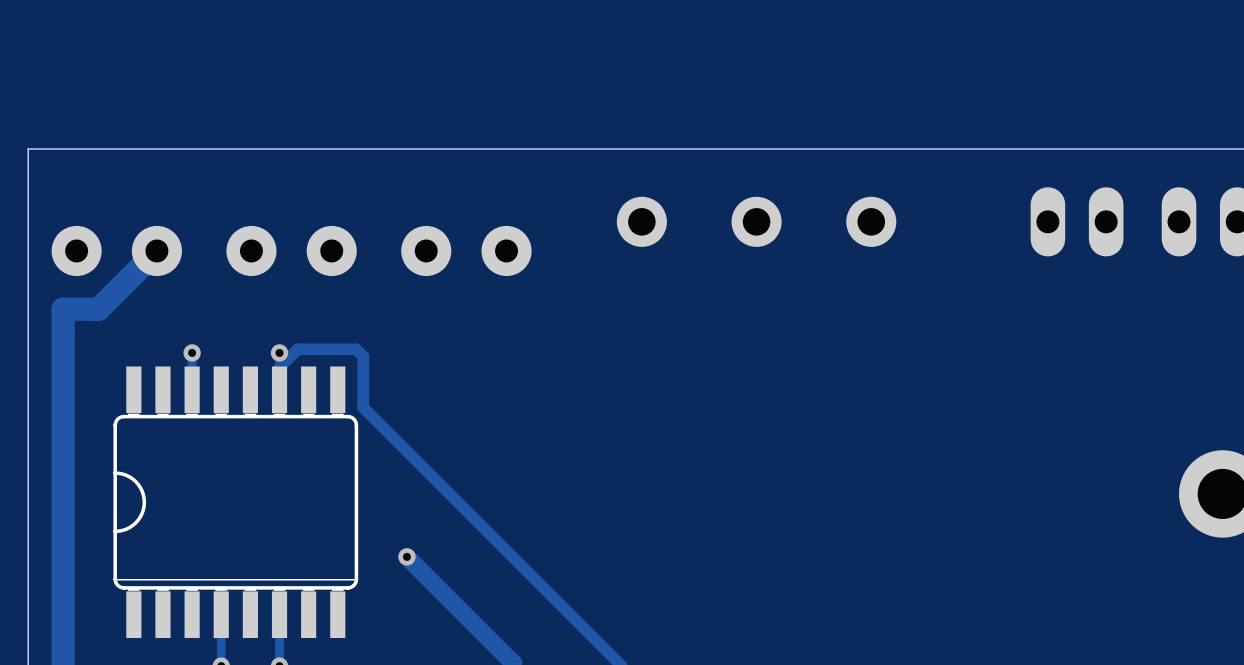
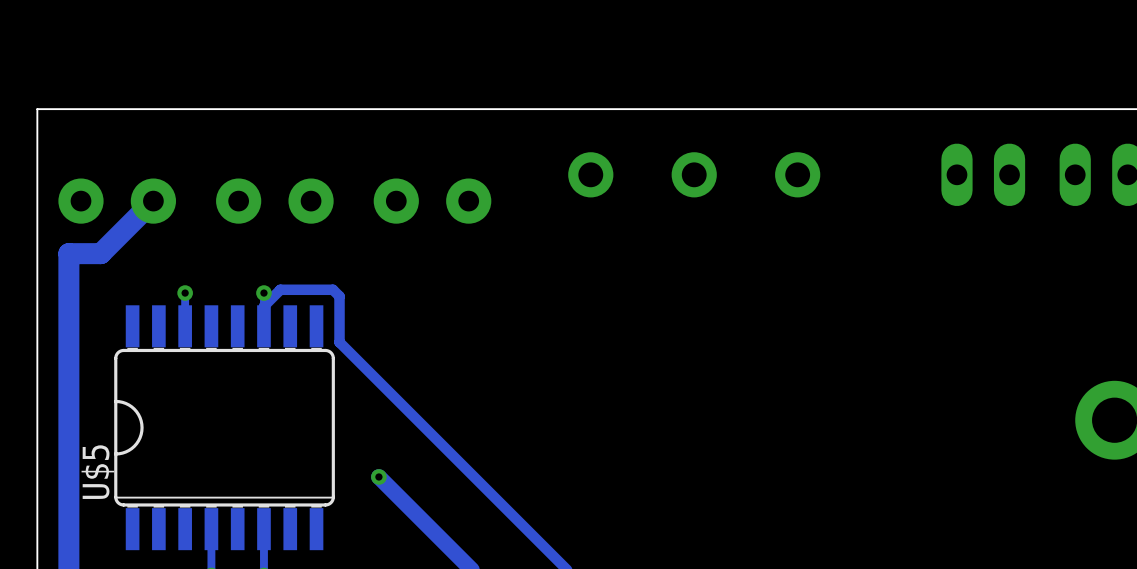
U$5 name: none -> U$5 (97, 472)

